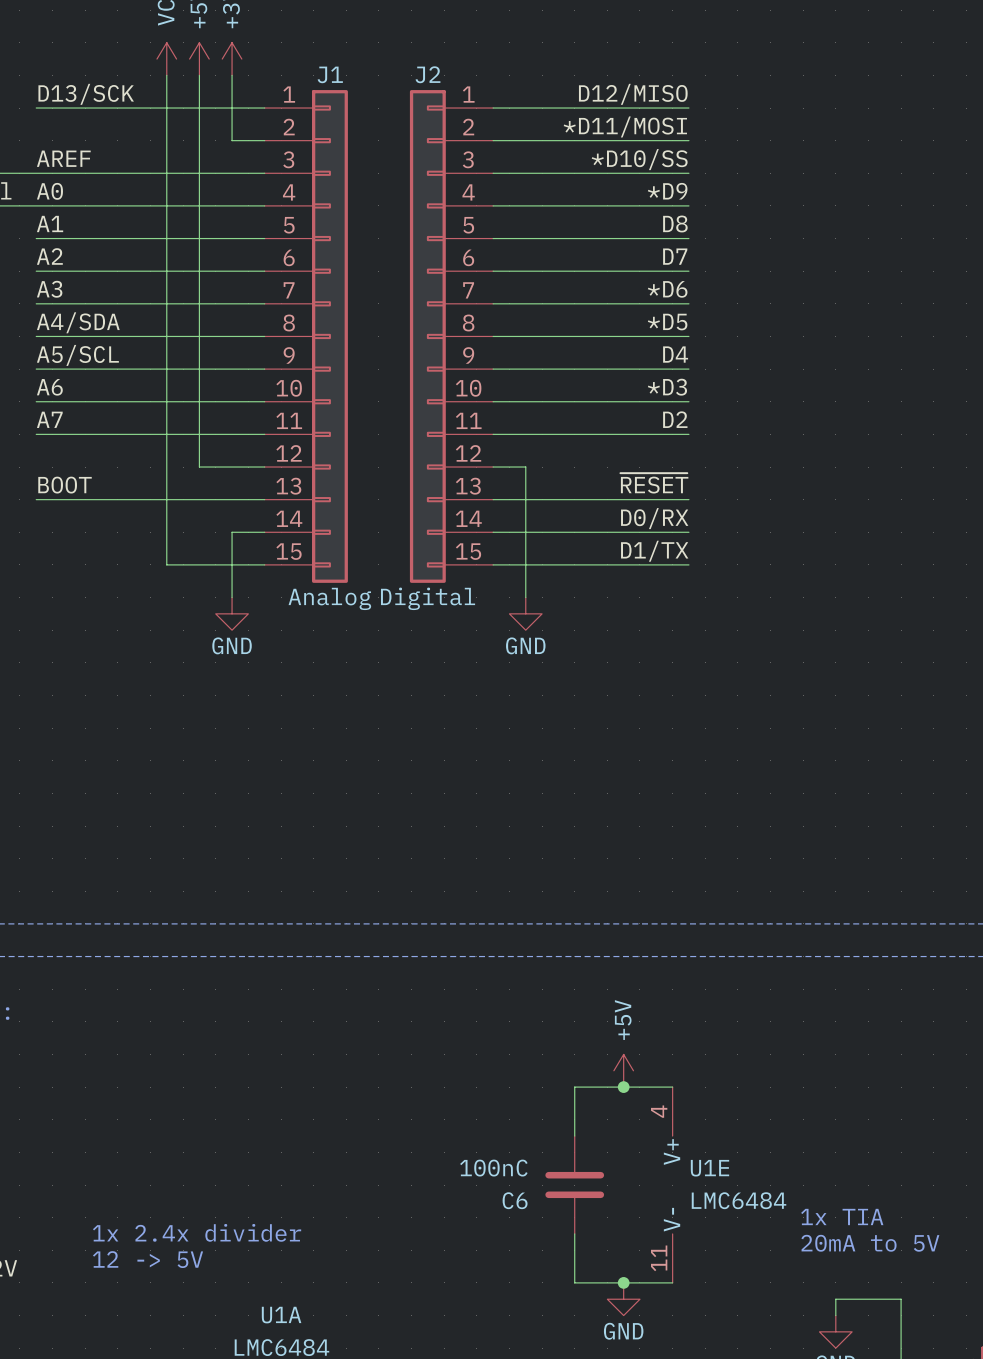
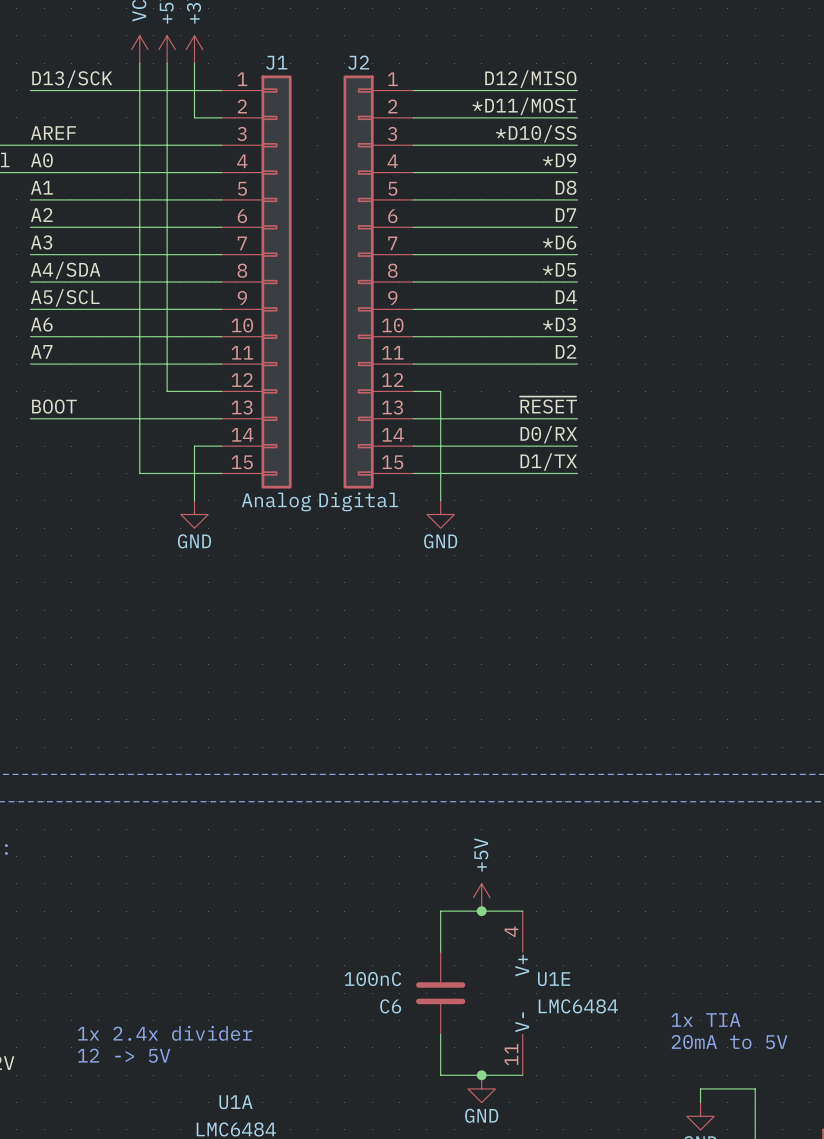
power symbol position: +5V (623, 1070) -> +5V (481, 897)
wire: (574, 1087) (574, 1136) -> (481, 911) (440, 911) (440, 952)
wire: (623, 1087) (672, 1087) -> none
junction position: (623, 1087) -> (481, 911)
C6 position: (574, 1185) -> (440, 993)
U1E position: (672, 1185) -> (522, 993)
wire: (574, 1233) (574, 1282) -> (440, 1034) (440, 1075) (481, 1075)
wire: (623, 1282) (672, 1282) -> none
junction position: (623, 1282) -> (481, 1075)
power symbol position: GND (623, 1299) -> GND (481, 1088)

